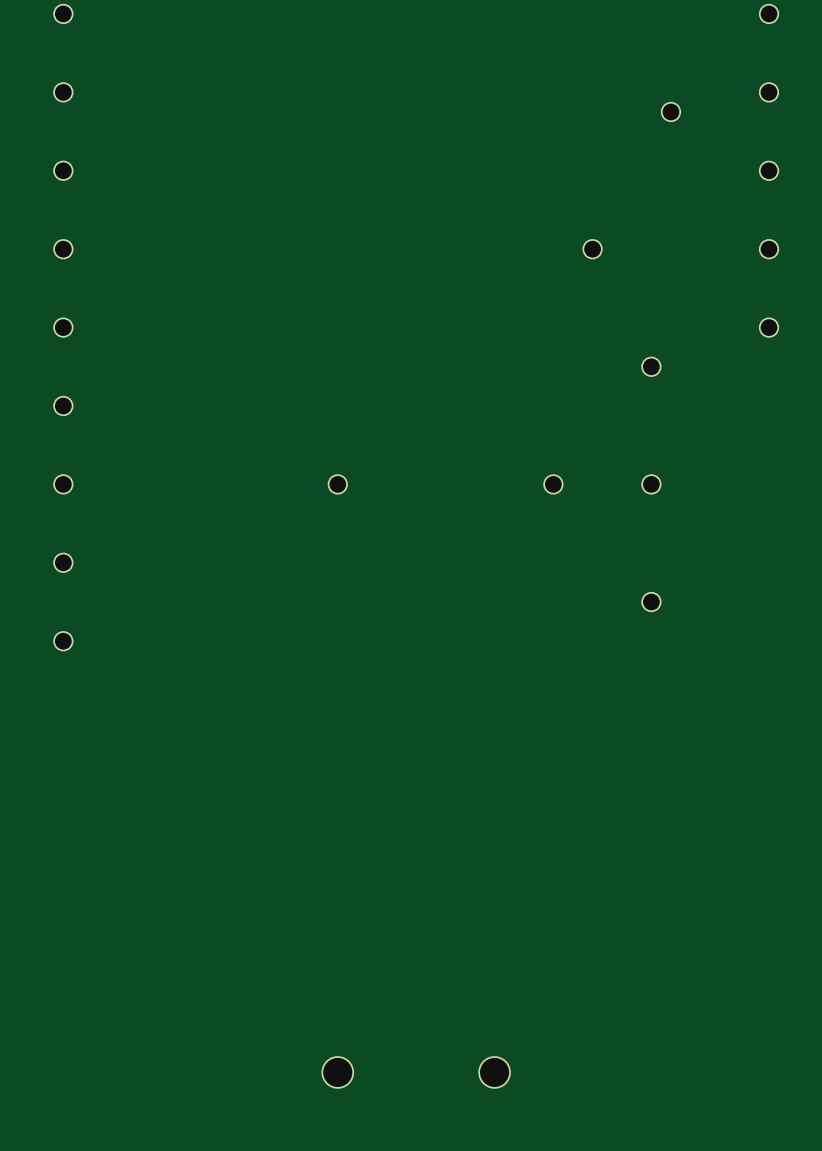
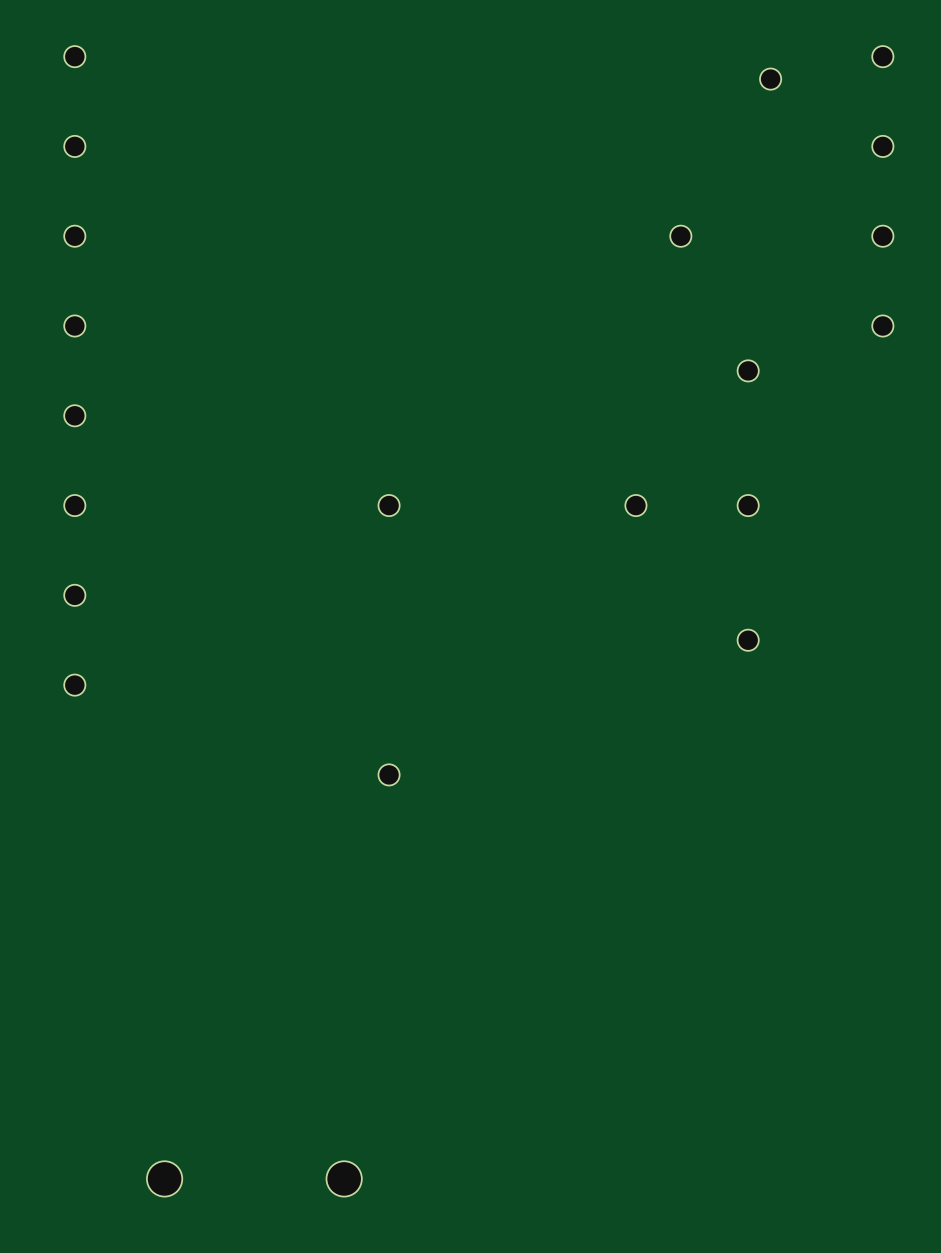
hole: none -> (389, 774)
hole: none -> (164, 1178)
hole position: (337, 1072) -> (344, 1178)
hole: (494, 1072) -> none

